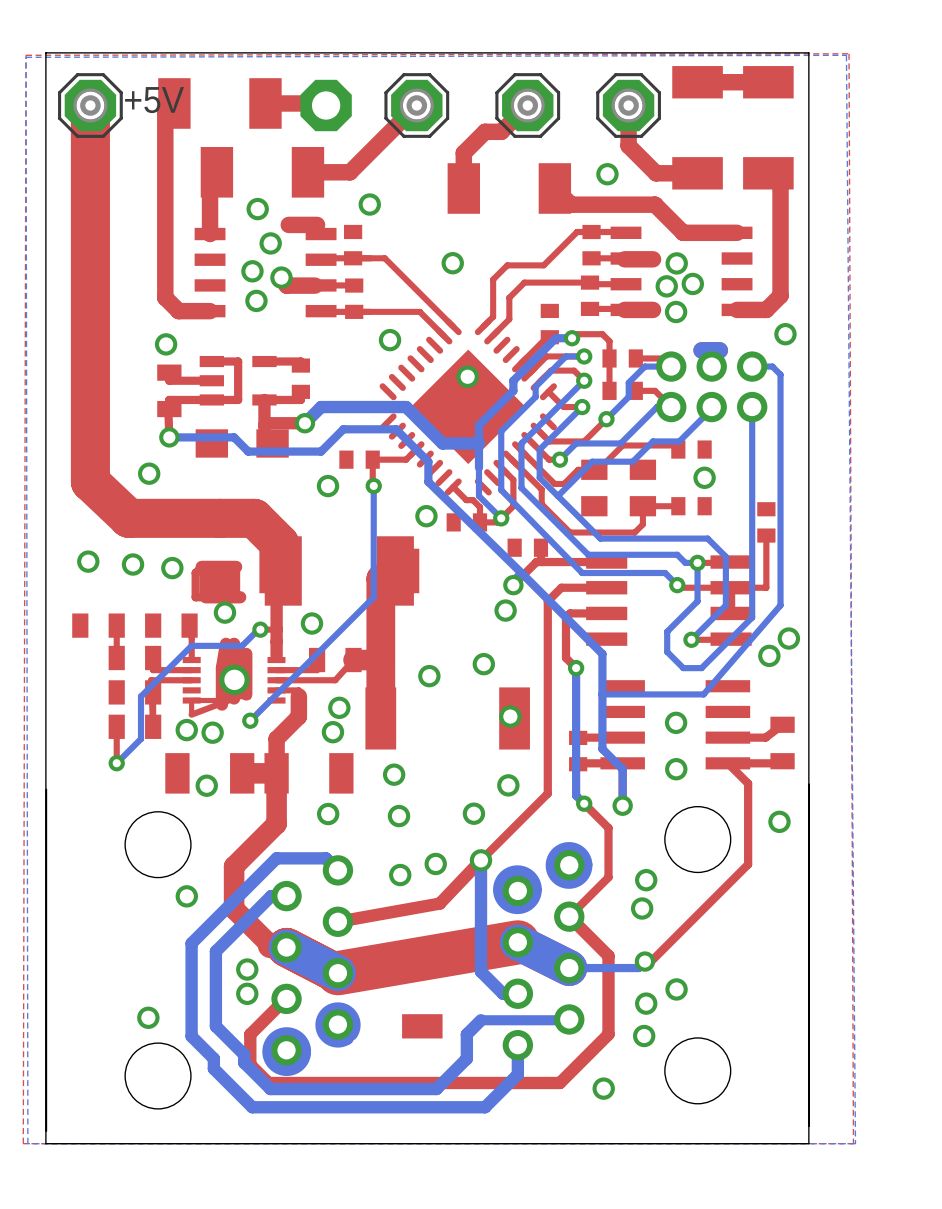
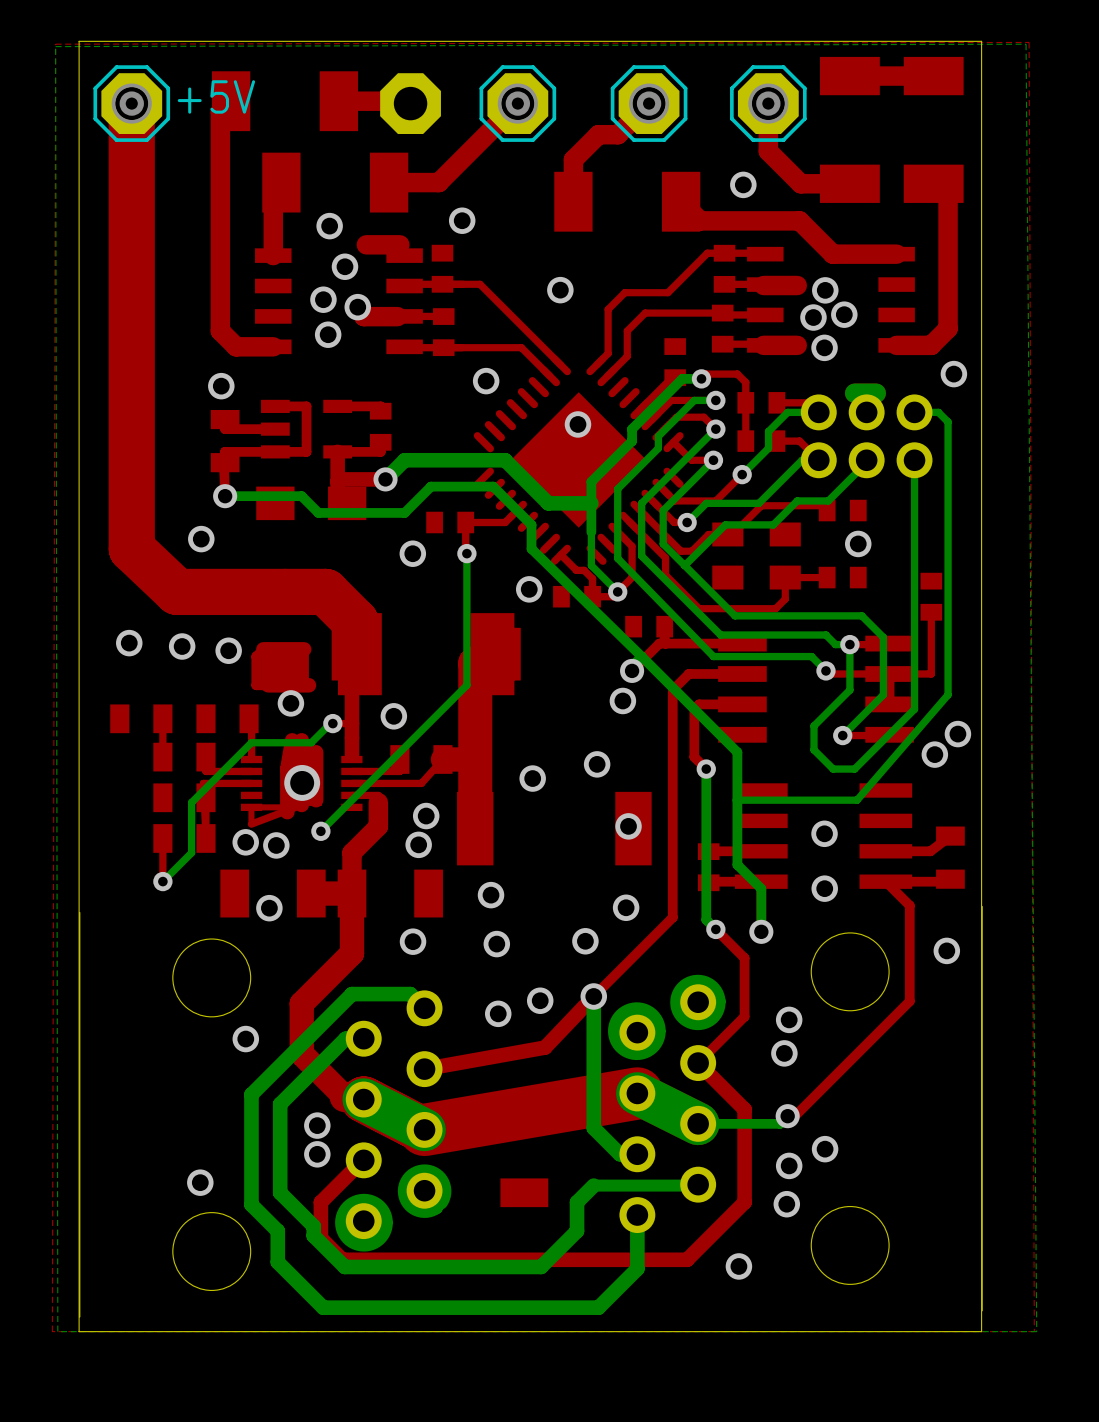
bottom track: (213, 1068) (252, 1107) (485, 1107) (517, 1074) -> (277, 1243) (277, 1262) (323, 1307) (598, 1307) (637, 1268) (637, 1249)

